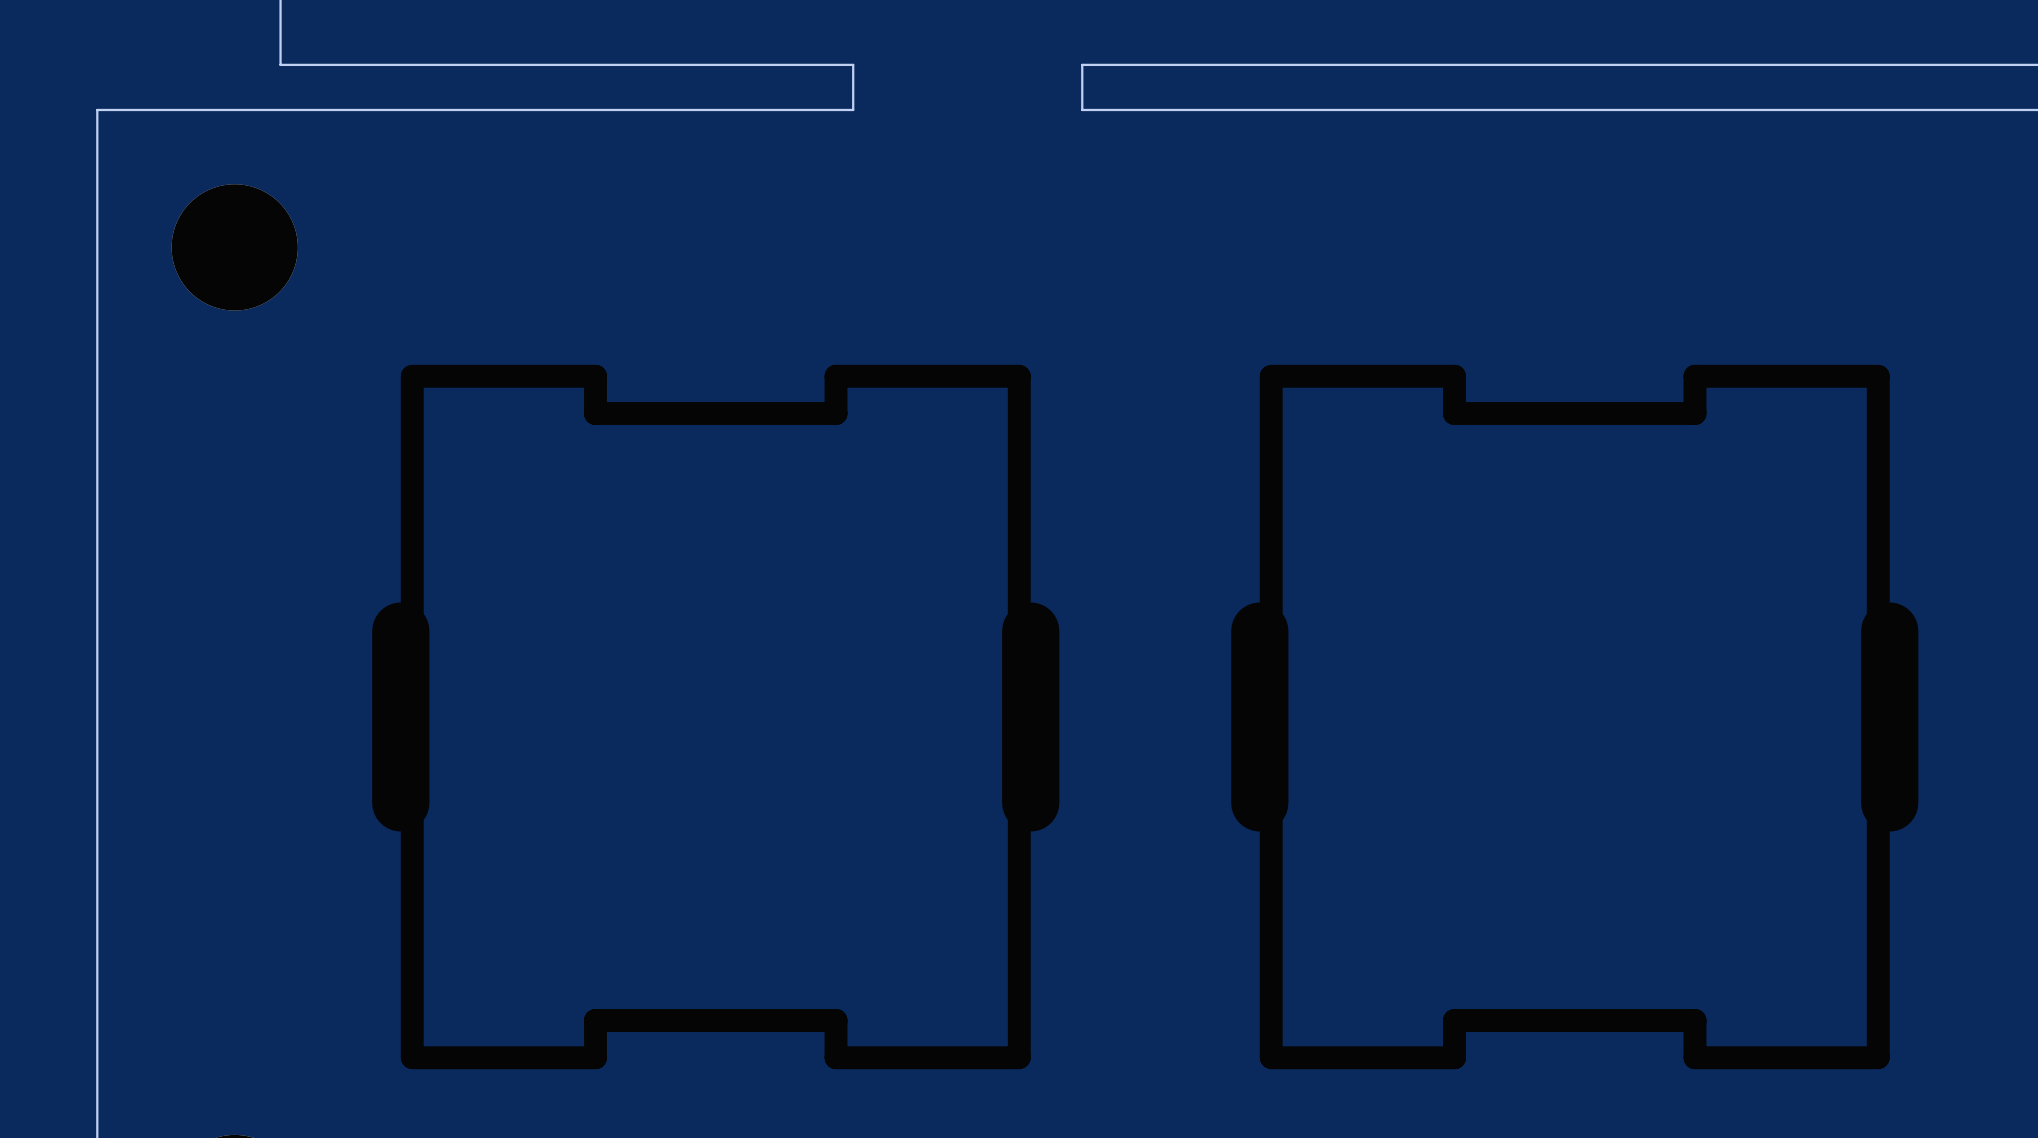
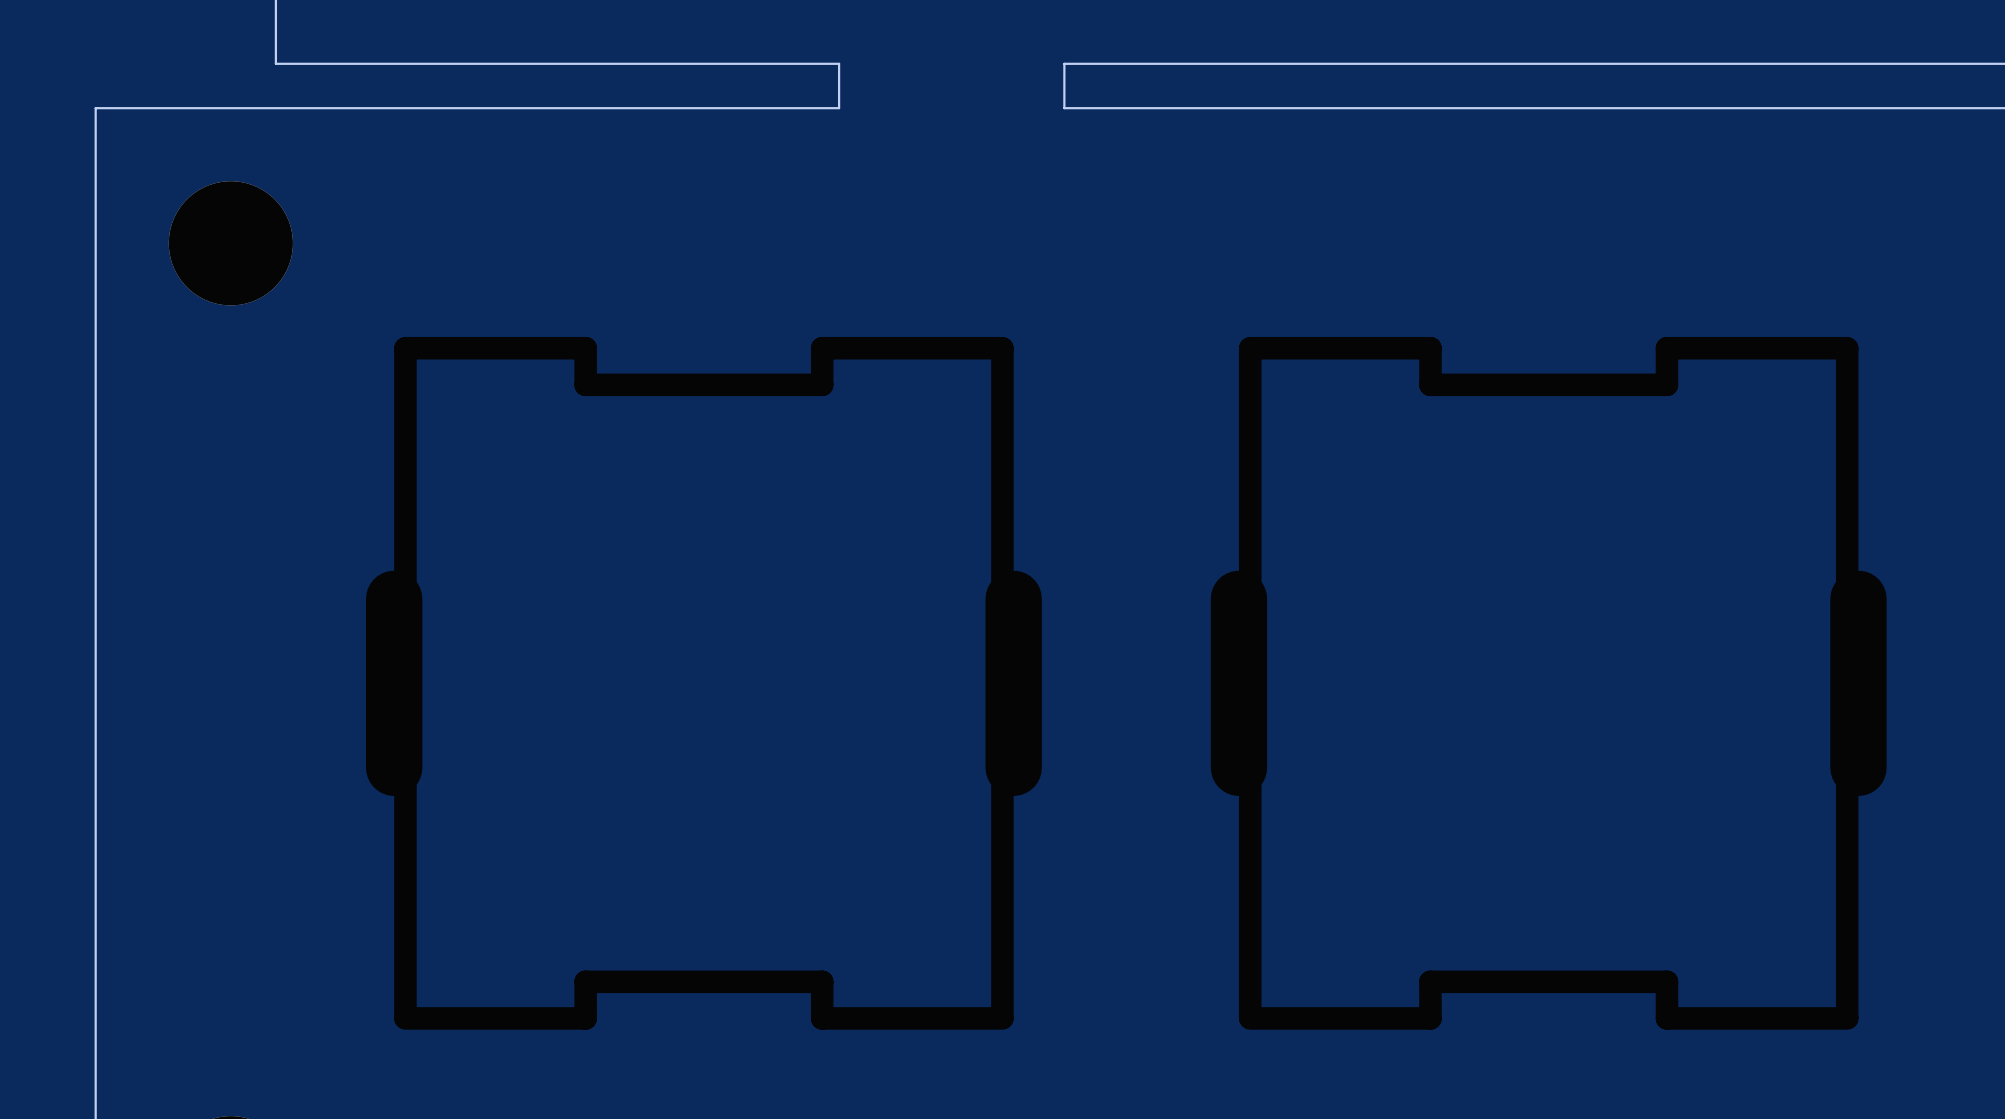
part position: (715, 717) -> (703, 683)
part position: (1574, 717) -> (1548, 683)

